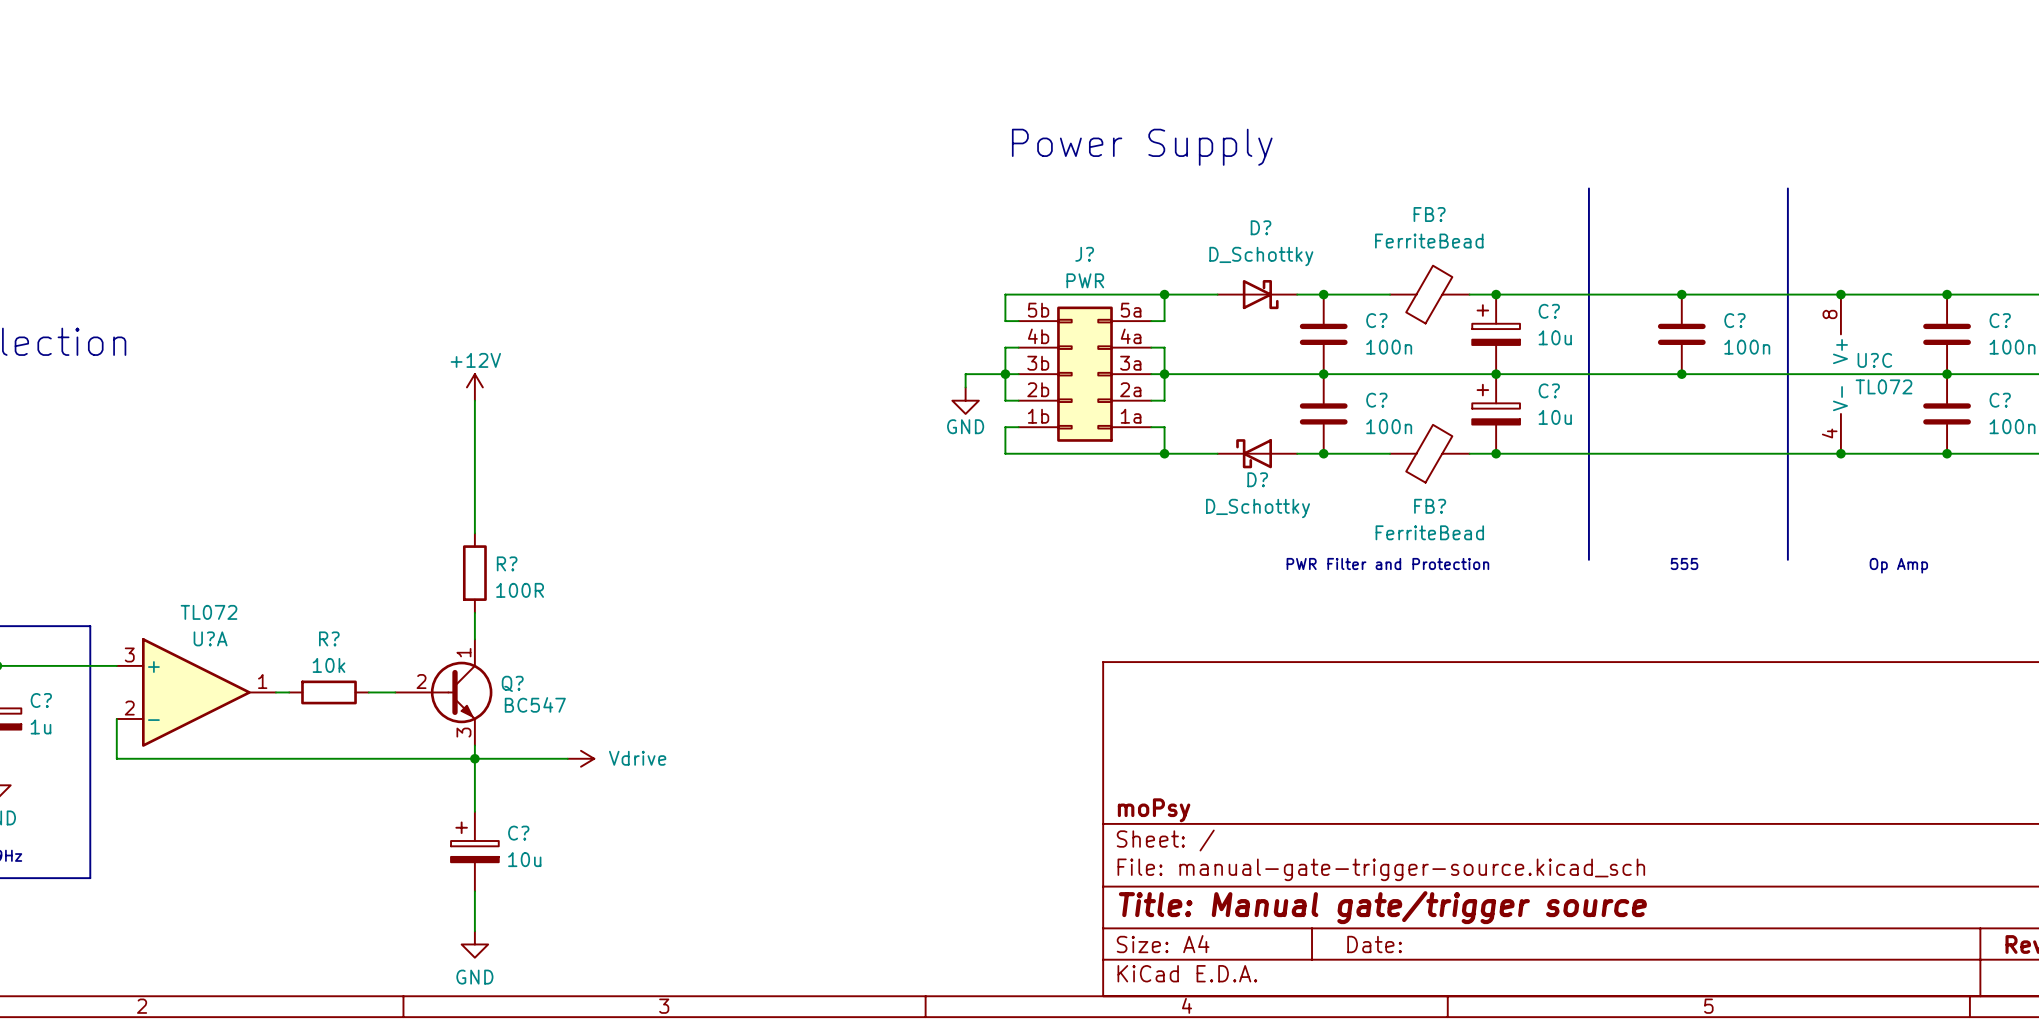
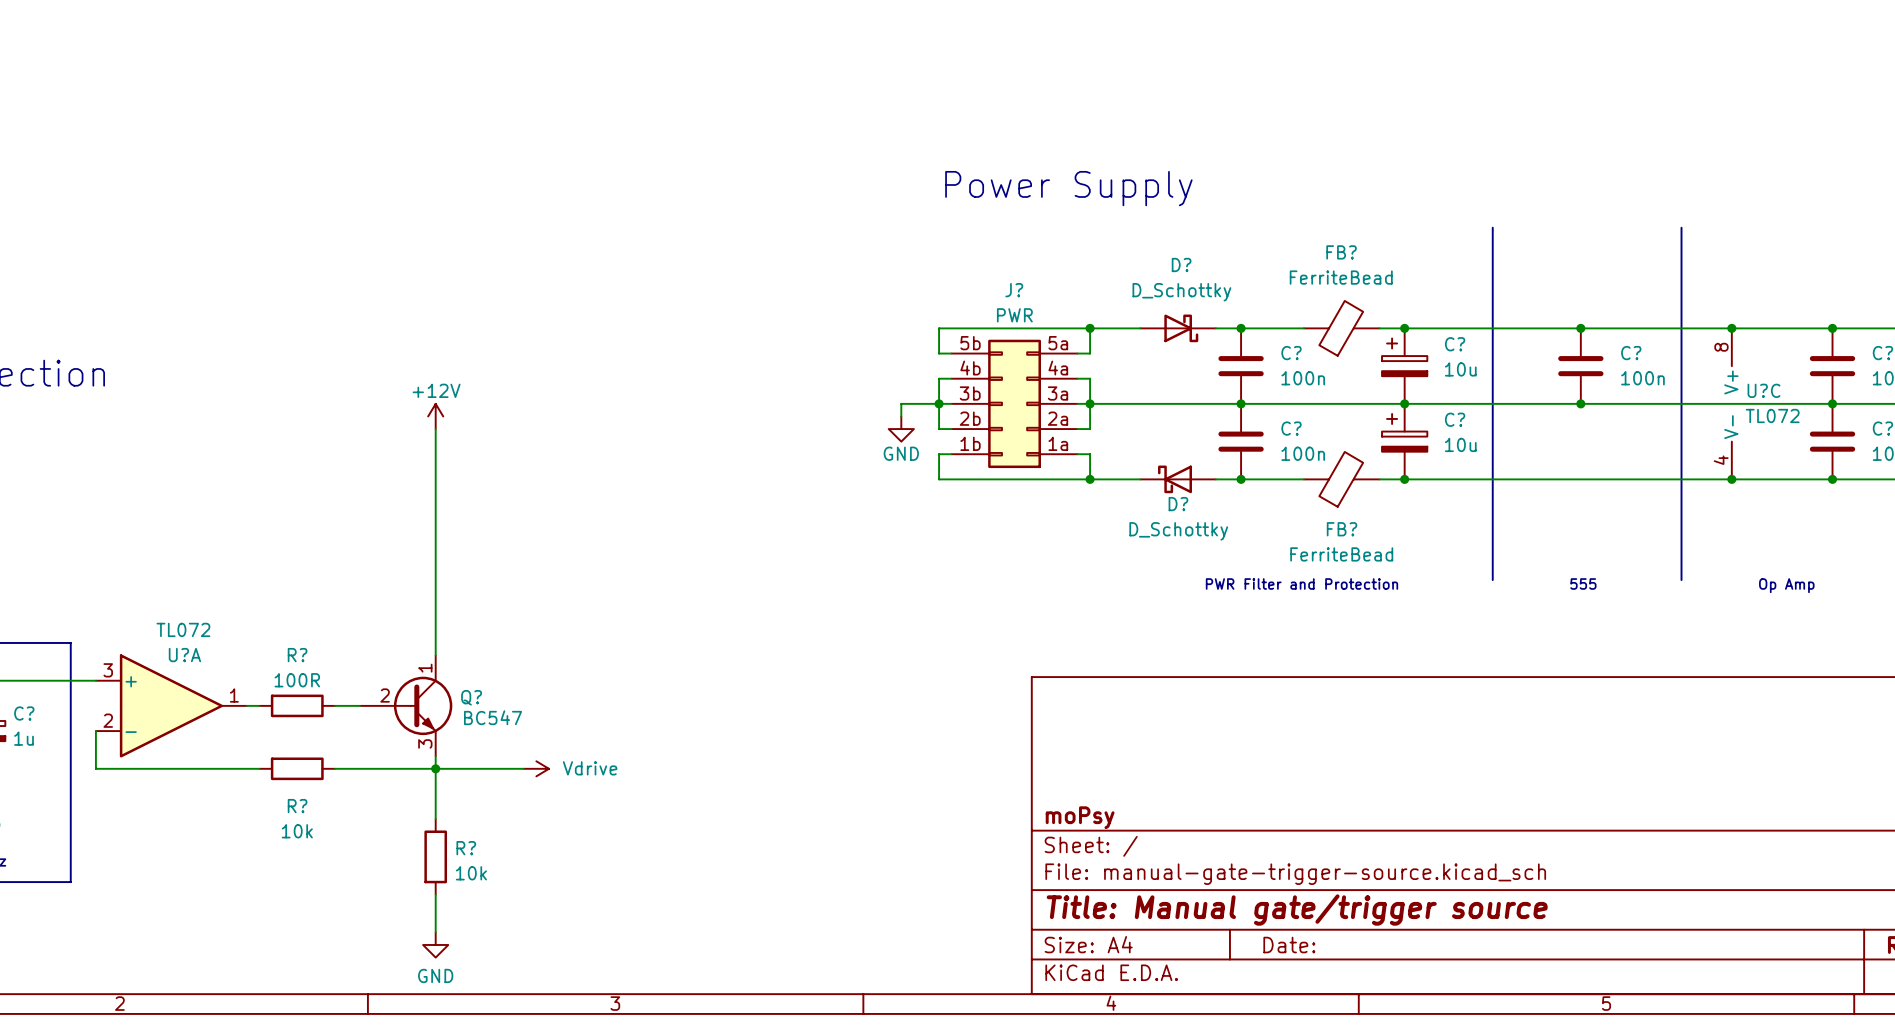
wire: none -> (435, 554) (435, 630)
R?: 100R (474, 573) -> none
R? value: 10k (329, 665) -> 100R (297, 680)
wire: (289, 758) (368, 758) -> none
R?: none -> 10k (297, 768)
C?: 10u (474, 851) -> none
R?: none -> 10k (435, 856)

